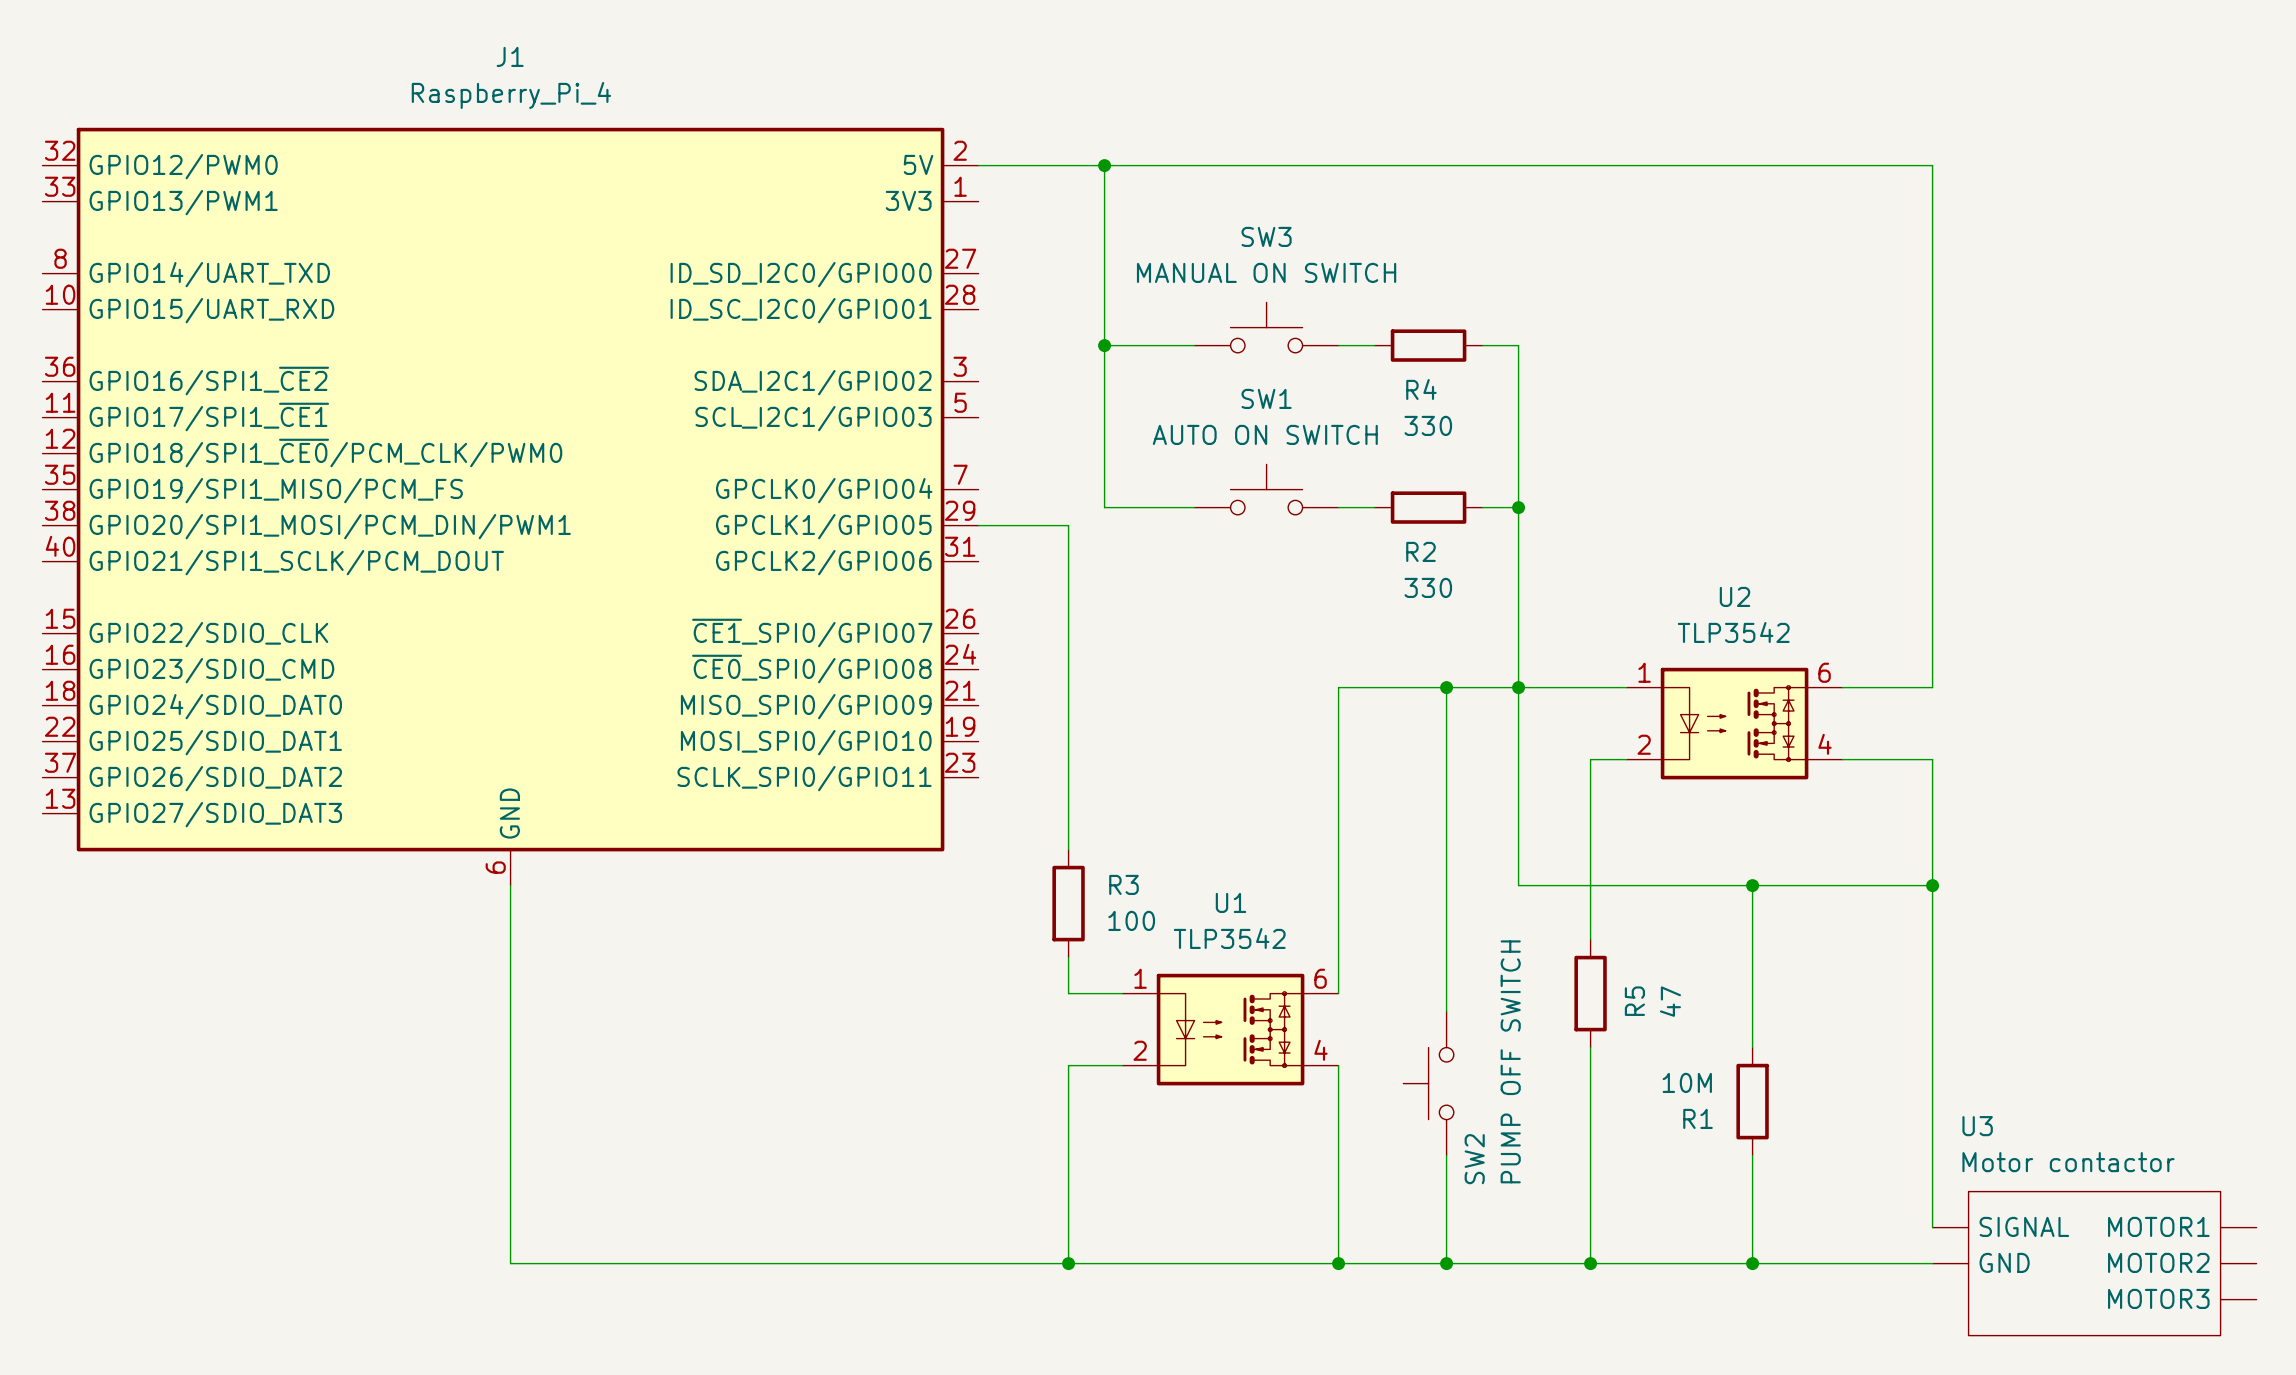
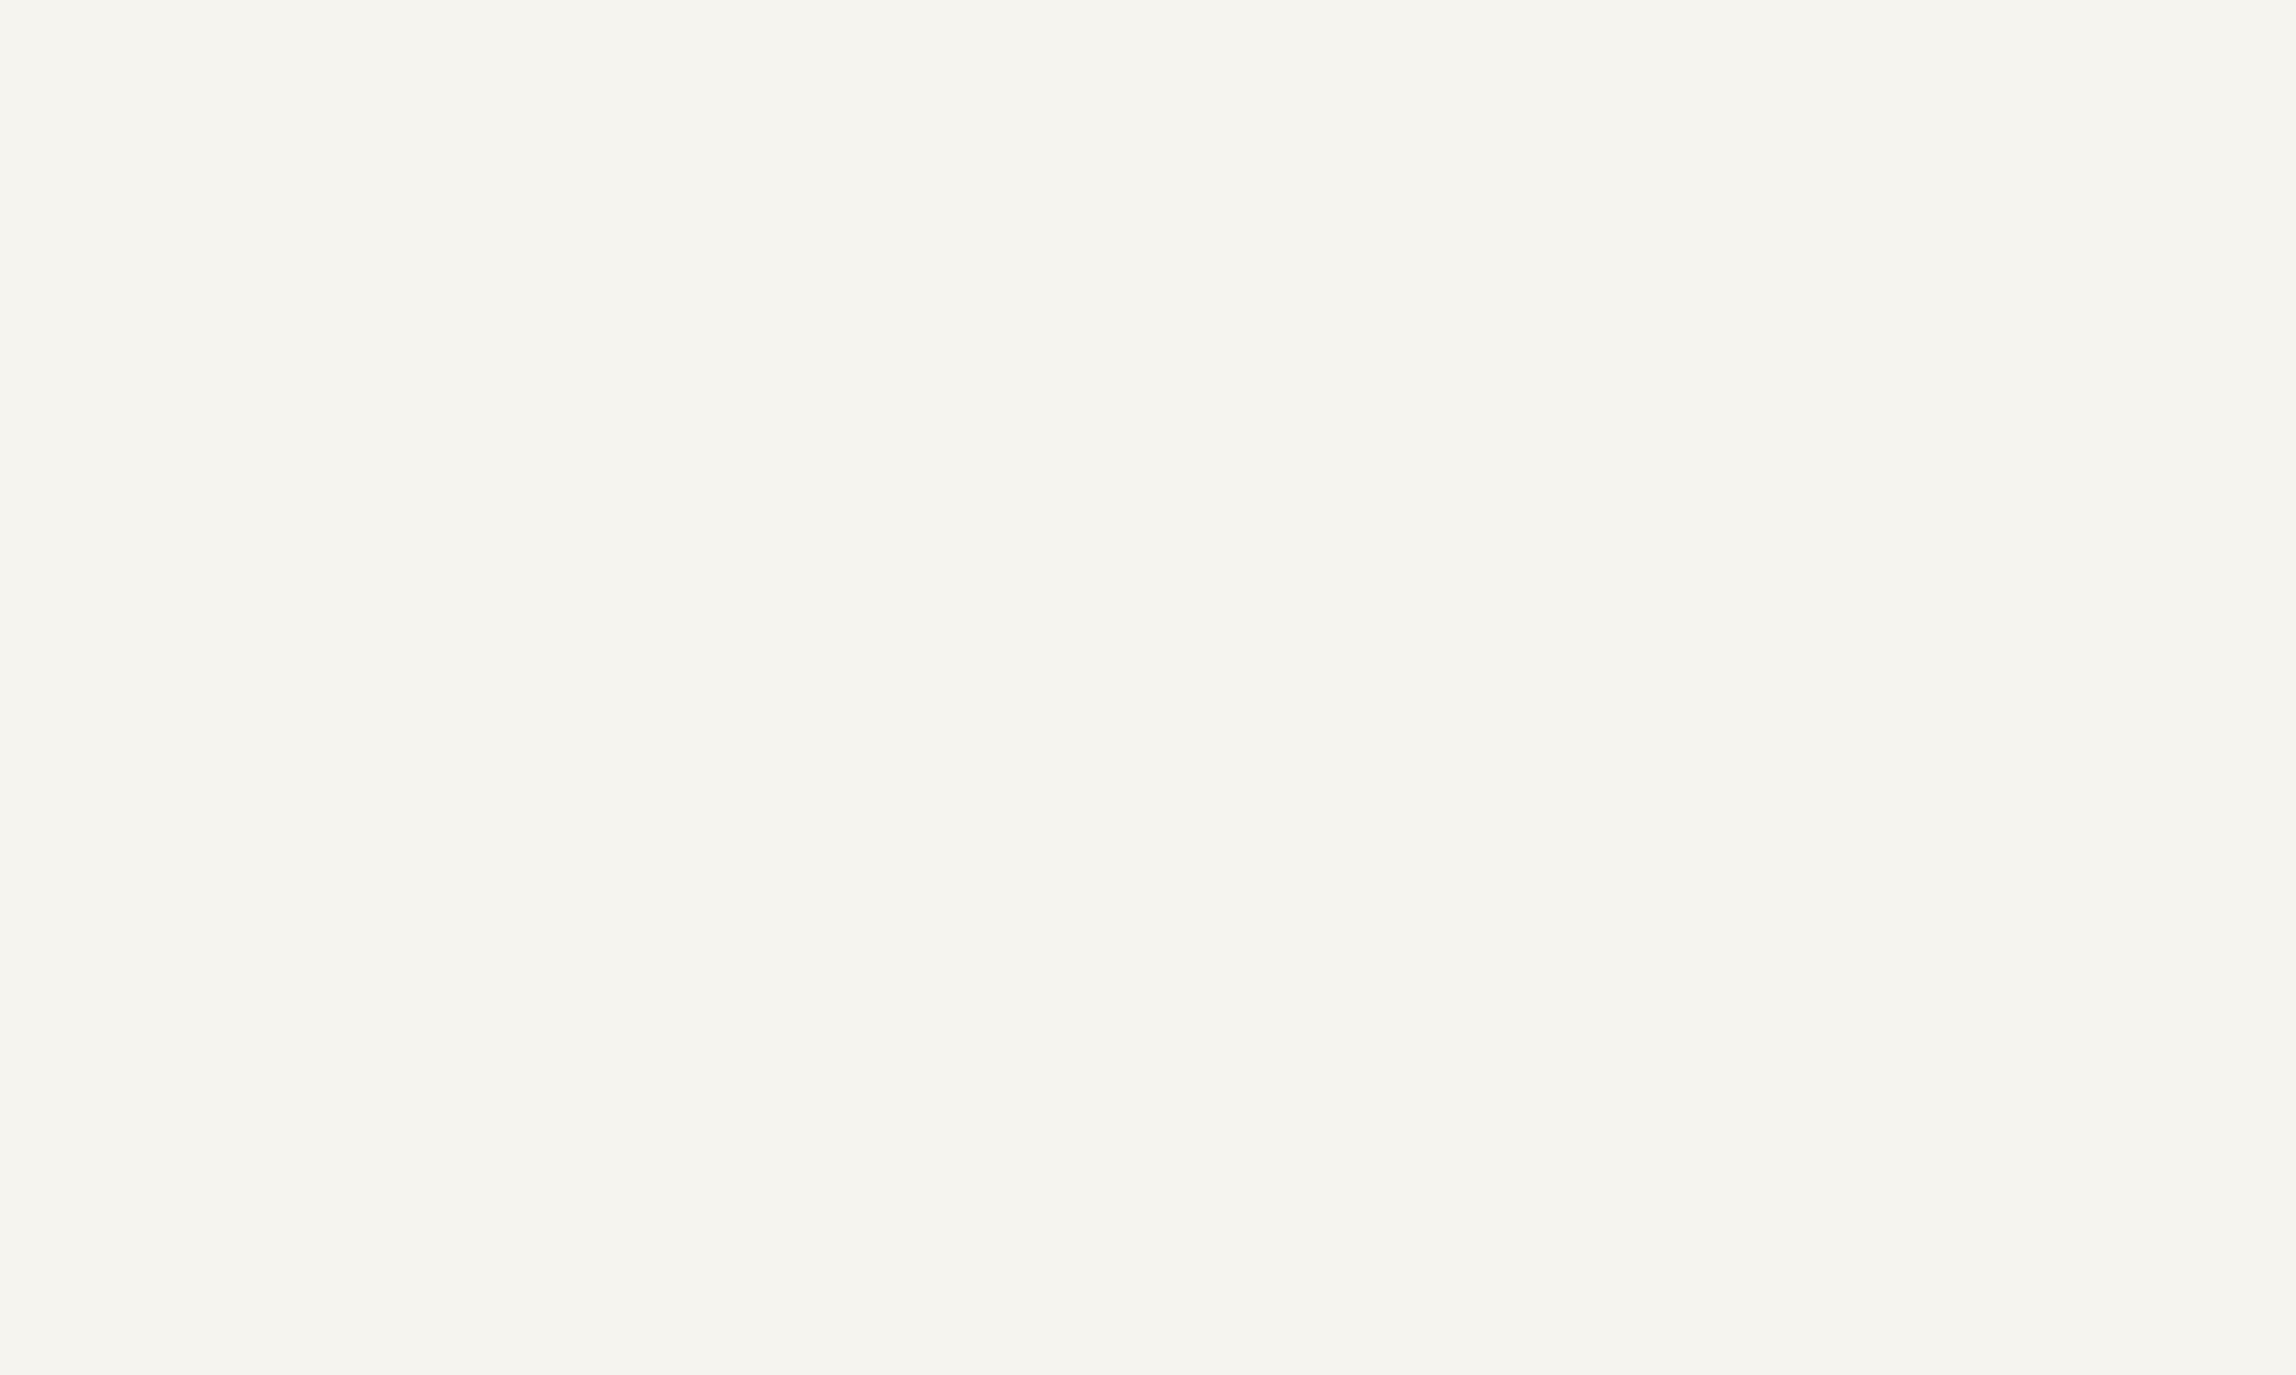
wire: (978, 165) (1932, 165) (1932, 687) (1842, 687) -> none
wire: (1104, 165) (1104, 507) (1194, 507) -> none
junction: (1104, 165) -> none
SW3: MANUAL ON SWITCH (1266, 327) -> none
wire: (1104, 345) (1194, 345) -> none
junction: (1104, 345) -> none
wire: (1338, 345) (1374, 345) -> none
R4: 330 (1428, 345) -> none
wire: (1482, 345) (1518, 345) (1518, 885) (1932, 885) -> none
SW1: AUTO ON SWITCH (1266, 489) -> none
J1: Raspberry_Pi_4 (510, 506) -> none
wire: (1338, 507) (1374, 507) -> none
R2: 330 (1428, 507) -> none
wire: (1482, 507) (1518, 507) -> none
junction: (1518, 507) -> none
wire: (978, 525) (1068, 525) (1068, 849) -> none
wire: (1446, 687) (1446, 1011) -> none
junction: (1446, 687) -> none
junction: (1518, 687) -> none
wire: (1626, 687) (1338, 687) (1338, 993) -> none
U2: TLP3542 (1734, 723) -> none
wire: (1626, 759) (1590, 759) (1590, 939) -> none
wire: (1842, 759) (1932, 759) (1932, 1227) -> none
wire: (510, 885) (510, 1263) (1932, 1263) -> none
wire: (1752, 885) (1752, 1047) -> none
junction: (1752, 885) -> none
junction: (1932, 885) -> none
R3: 100 (1068, 903) -> none
wire: (1068, 957) (1068, 993) (1122, 993) -> none
R5: 47 (1590, 993) -> none
U1: TLP3542 (1230, 1029) -> none
wire: (1590, 1047) (1590, 1263) -> none
wire: (1122, 1065) (1068, 1065) (1068, 1263) -> none
wire: (1338, 1065) (1338, 1263) -> none
SW2: PUMP OFF SWITCH (1428, 1083) -> none
R1: 10M (1752, 1101) -> none
wire: (1446, 1155) (1446, 1263) -> none
wire: (1752, 1155) (1752, 1263) -> none
junction: (1068, 1263) -> none
junction: (1338, 1263) -> none
junction: (1446, 1263) -> none
junction: (1590, 1263) -> none
junction: (1752, 1263) -> none
U3: Motor contactor (2094, 1263) -> none

